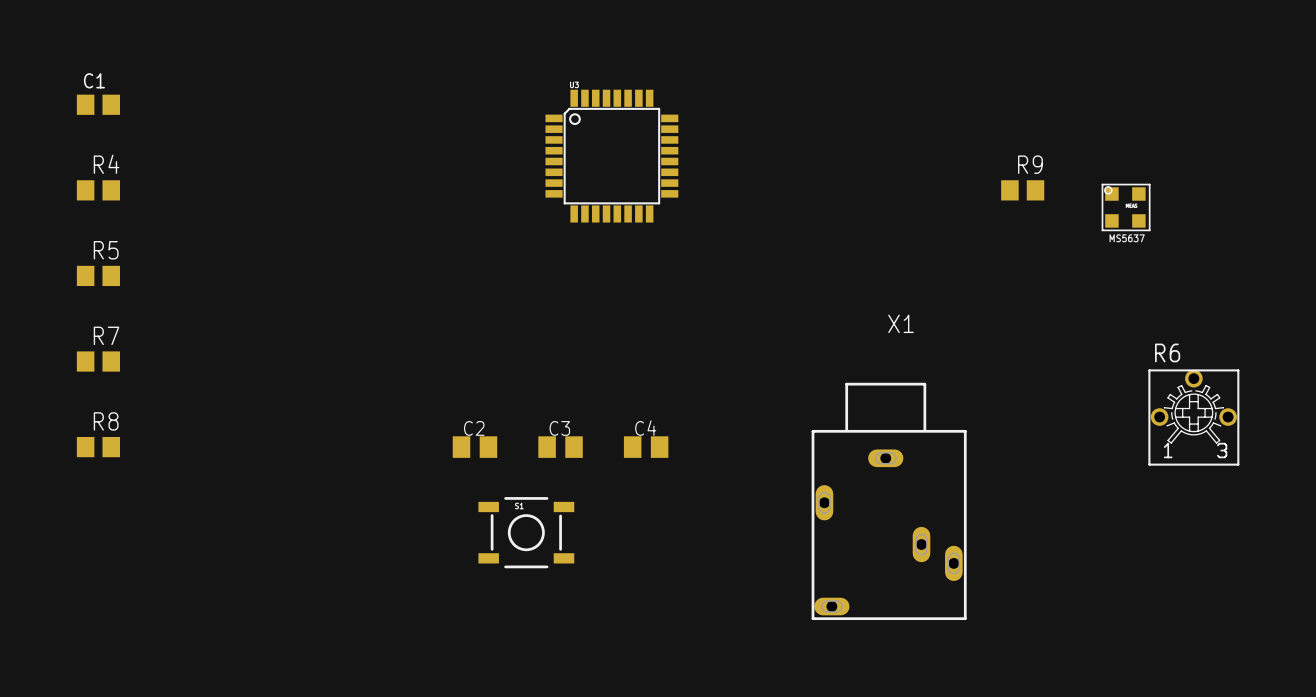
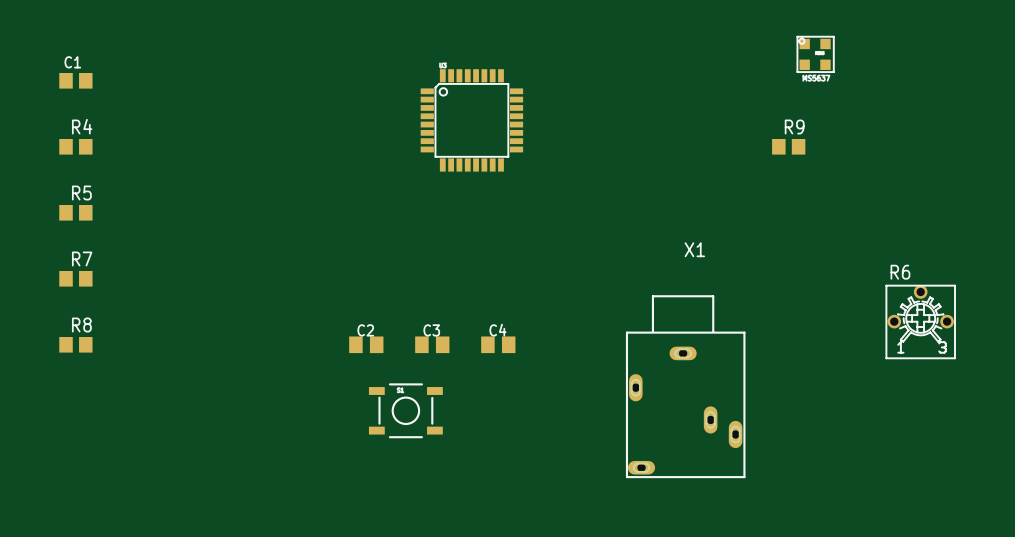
part position: (1126, 207) -> (815, 54)

